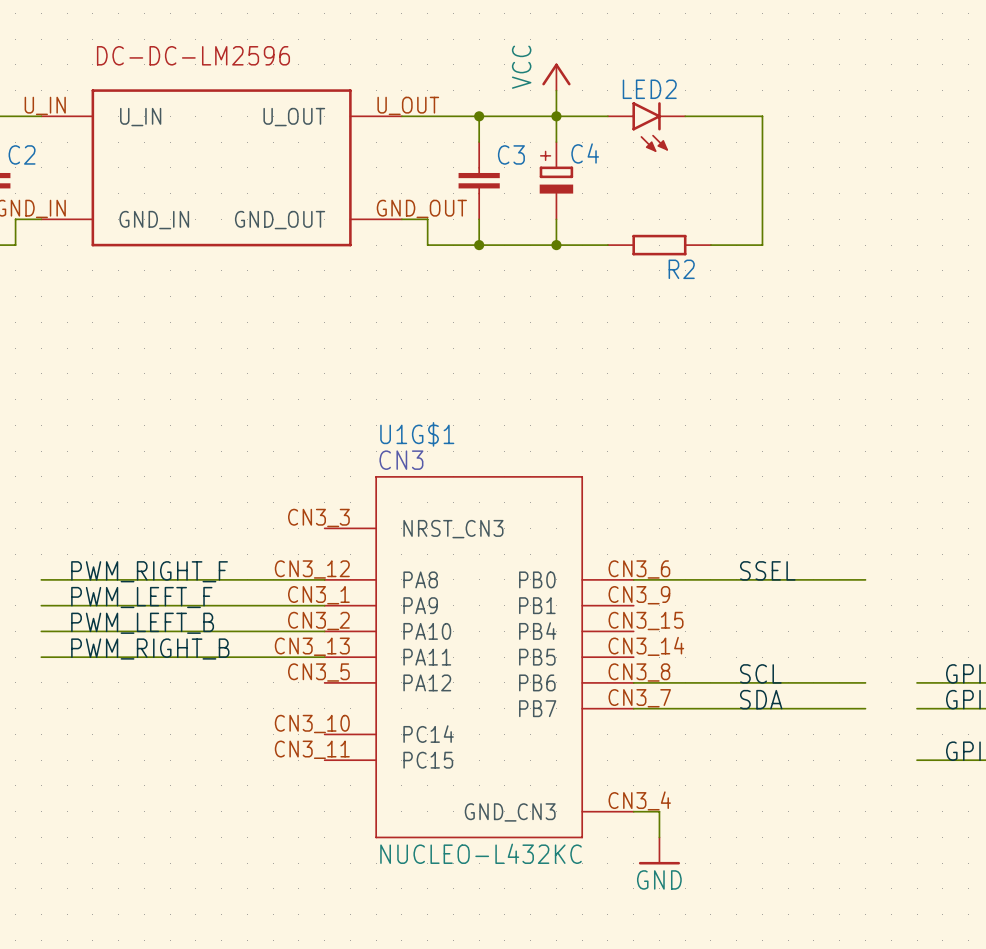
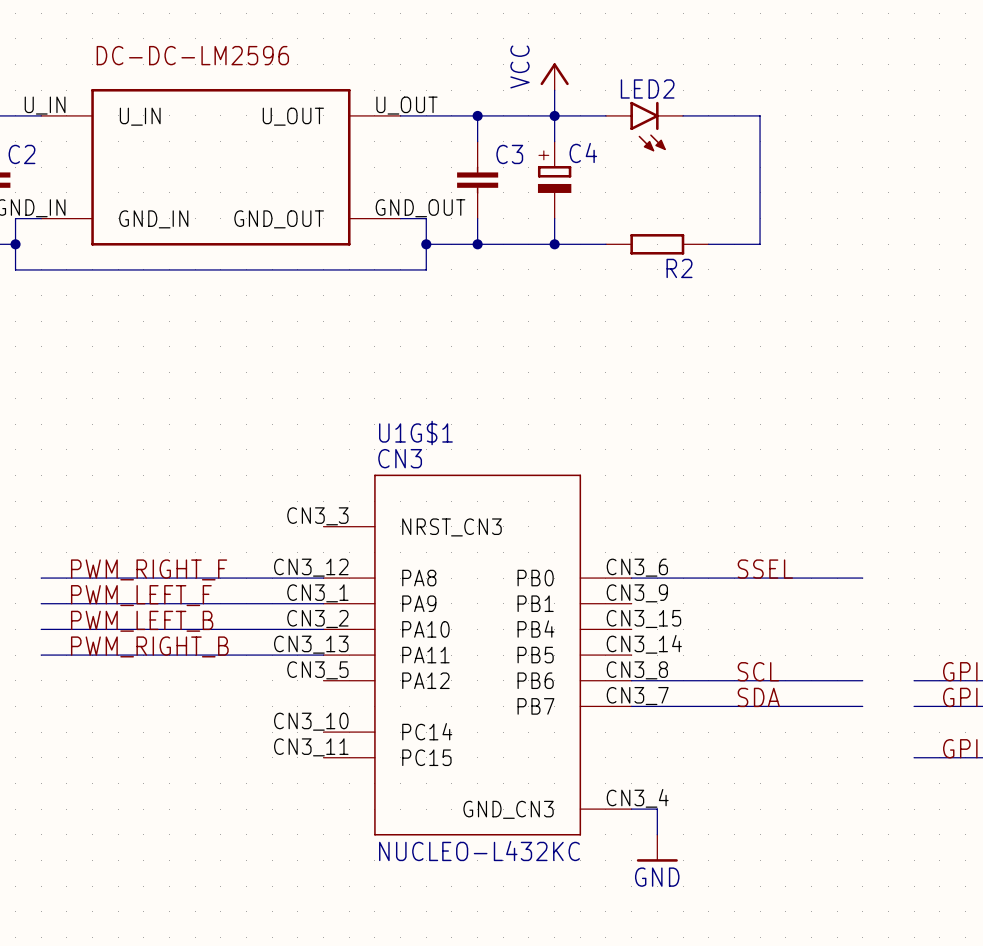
wire: none -> (15, 244) (15, 269) (426, 269) (426, 244)
junction: none -> (15, 244)
junction: none -> (426, 244)

